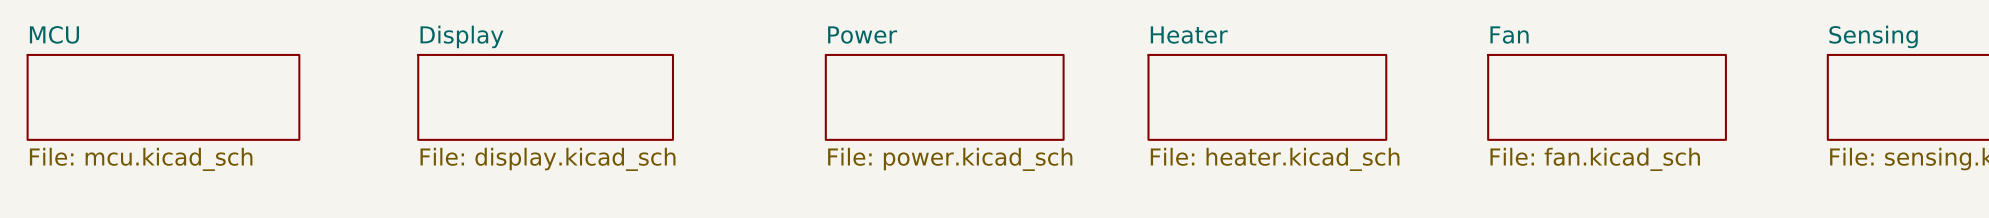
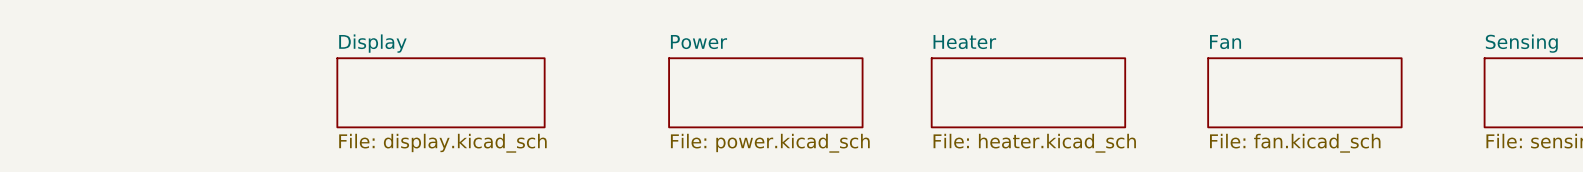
sheet MCU: File: mcu.kicad_sch (163, 97) -> none

